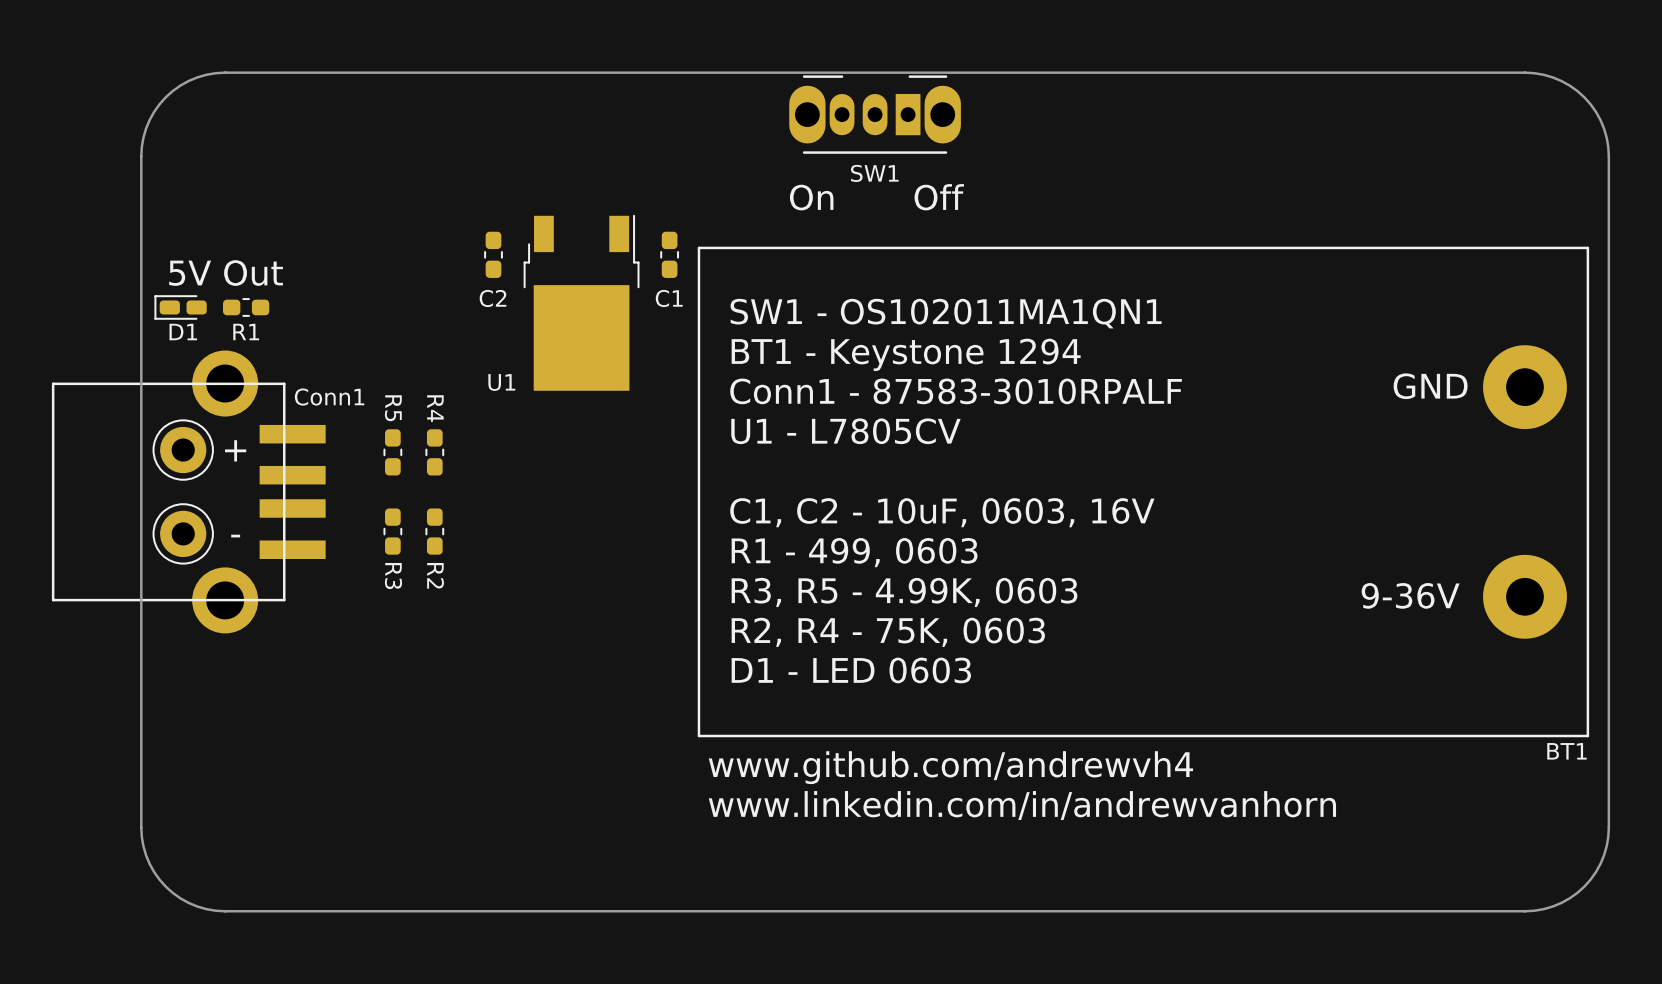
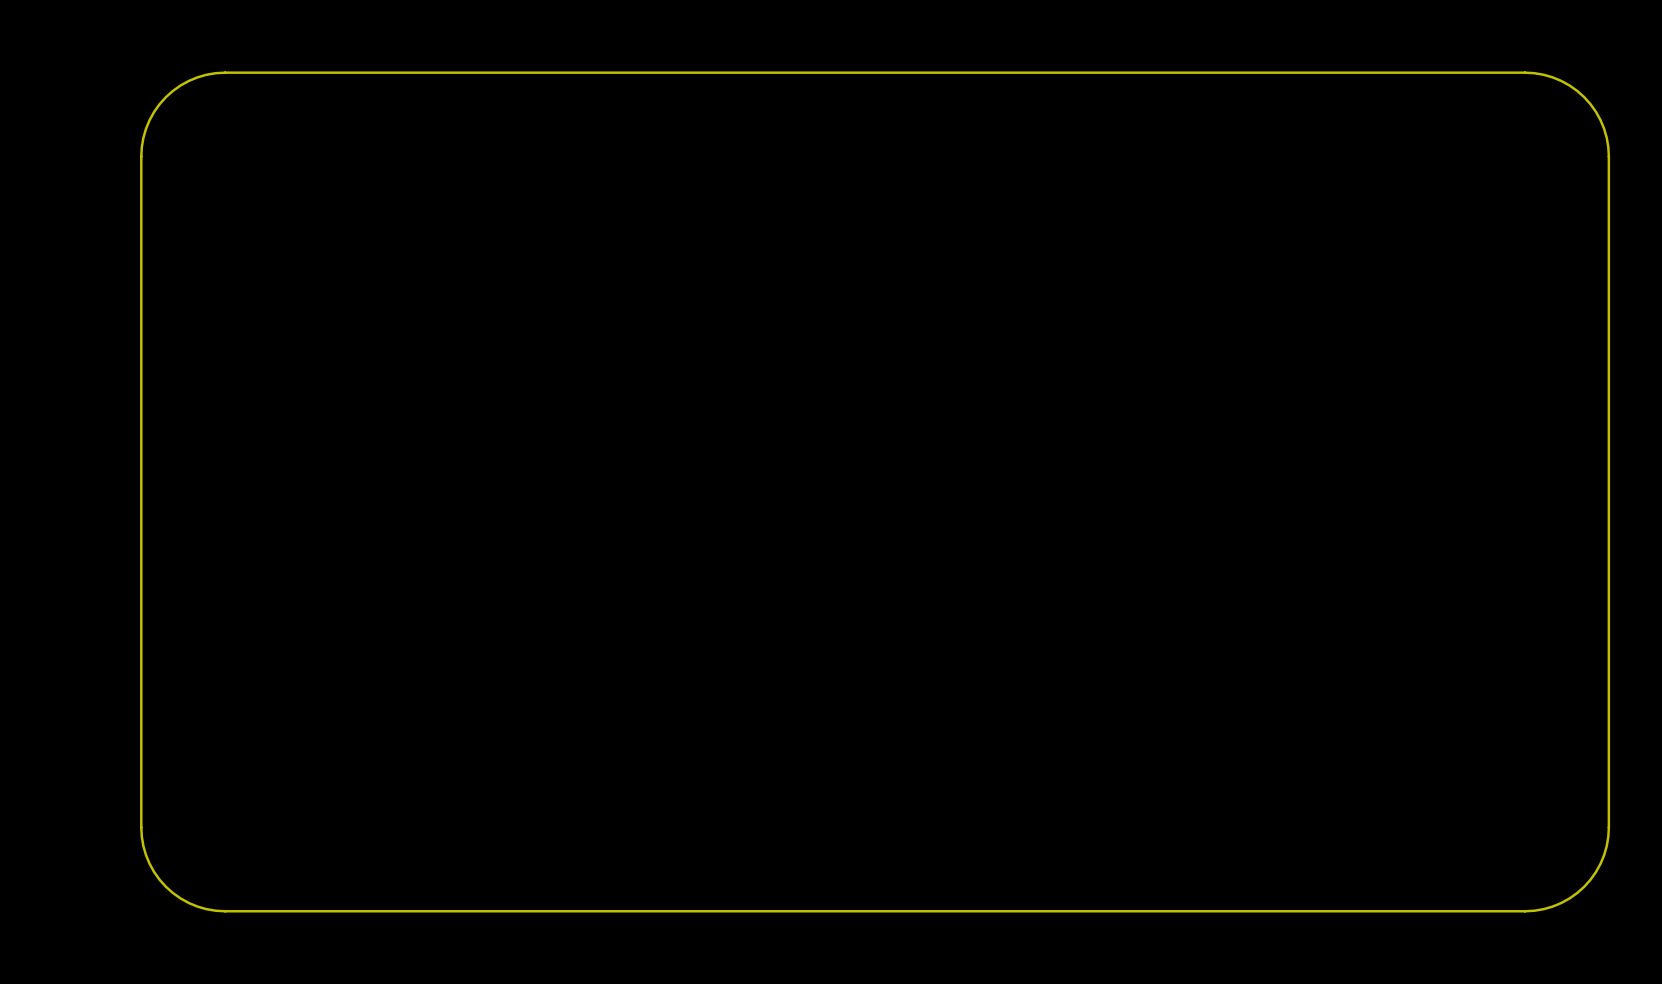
SW1: (875, 114) -> none
text: On (811, 197) -> none
text: Off (939, 197) -> none
C2: (493, 254) -> none
C1: (669, 254) -> none
text: 5V Out (226, 273) -> none
U1: (581, 302) -> none
D1: (180, 307) -> none
R1: (246, 307) -> none
text: SW1 - OS102011MA1QN1 (946, 313) -> none
text: BT1 - Keystone 1294 (906, 354) -> none
text: GND (1430, 386) -> none
text: Conn1 - 87583-3010RPALF (956, 391) -> none
text: U1 - L7805CV (845, 431) -> none
part: (183, 450) -> none
text: + (235, 450) -> none
R5: (392, 452) -> none
R4: (434, 452) -> none
Conn1: (188, 491) -> none
BT1: (1143, 491) -> none
text: C1, C2 - 10uF, 0603, 16V (942, 512) -> none
R3: (392, 531) -> none
R2: (434, 531) -> none
part: (183, 533) -> none
text: - (235, 536) -> none
text: R1 - 499, 0603 (854, 552) -> none
text: R3, R5 - 4.99K, 0603 (904, 592) -> none
text: 9-36V (1410, 595) -> none
text: R2, R4 - 75K, 0603 (888, 632) -> none
text: D1 - LED 0603 (851, 670) -> none
text: www.github.com/andrewvh4 (950, 767) -> none
text: www.linkedin.com/in/andrewvanhorn (1022, 805) -> none

